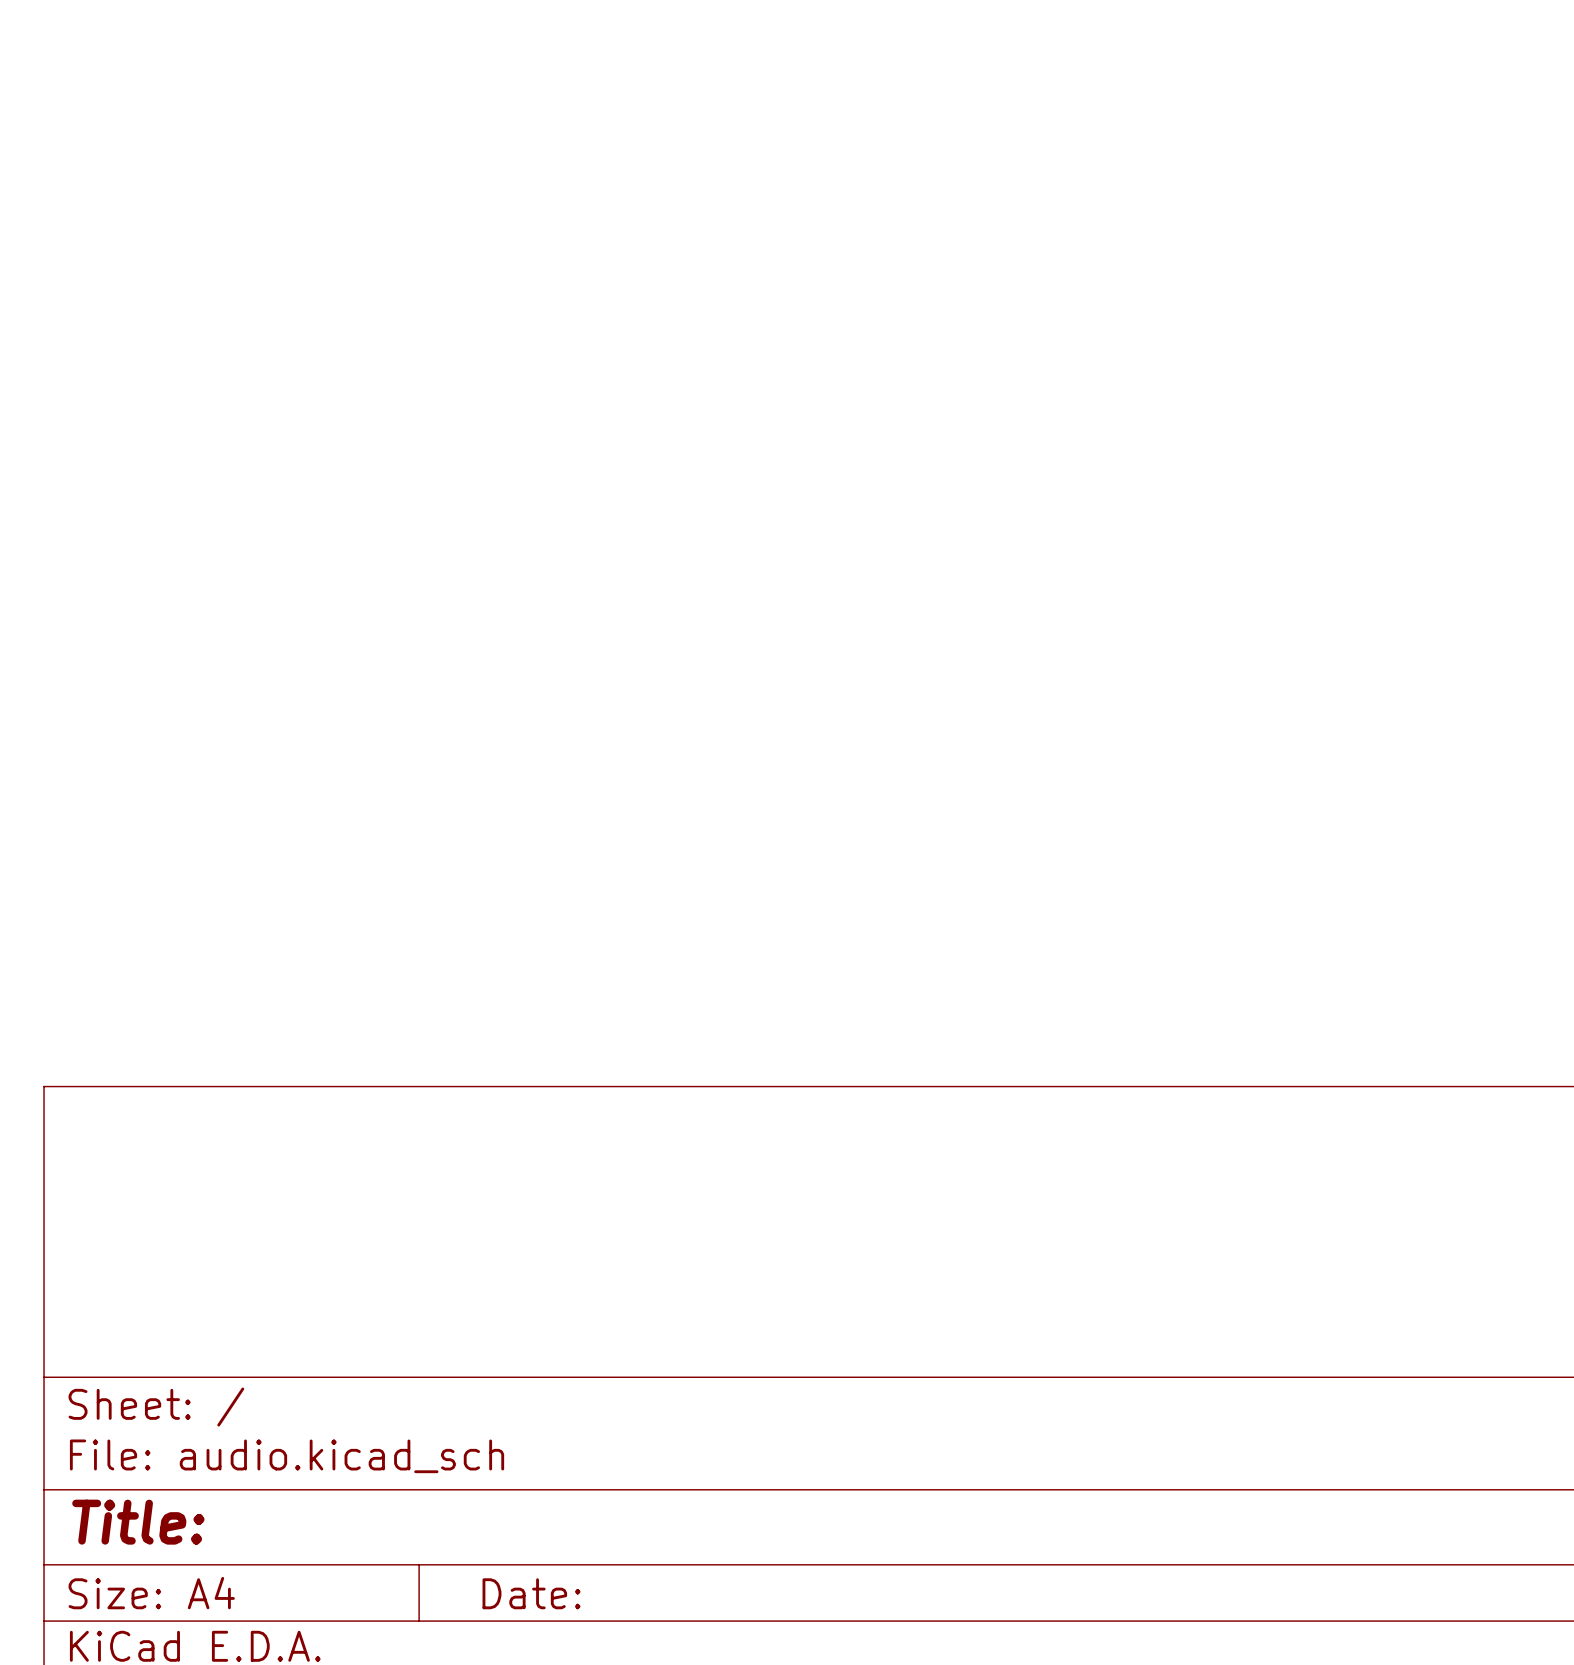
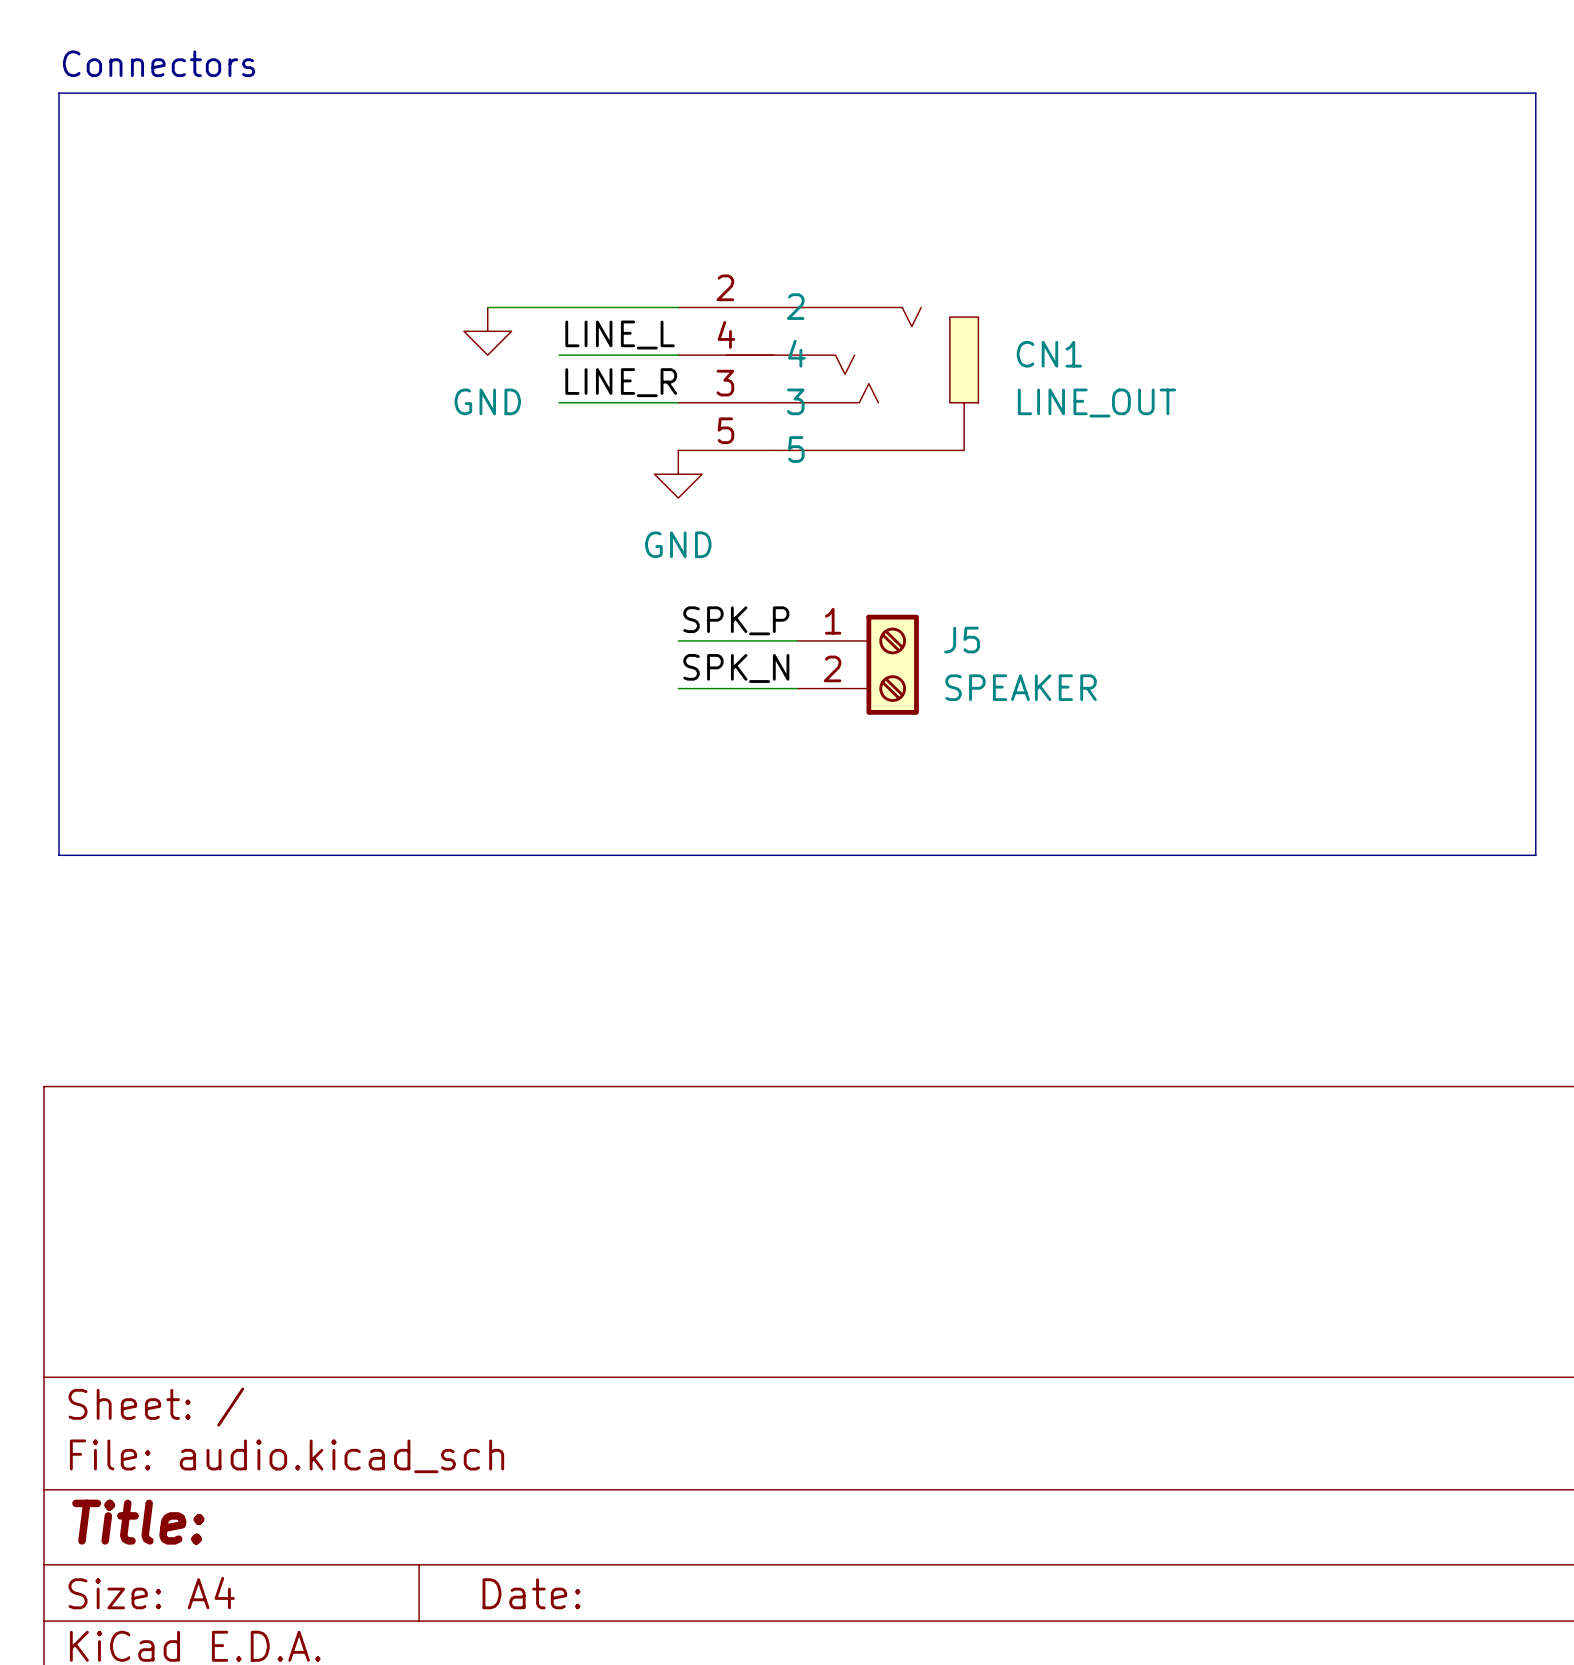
text: none -> Connectors (159, 63)
line: none -> (59, 93) (1535, 93) (1535, 855) (59, 855) (59, 93)
wire: none -> (487, 307) (678, 307)
power symbol: none -> GND (487, 331)
label: none -> LINE_L (620, 335)
wire: none -> (559, 355) (678, 355)
CN1: none -> LINE_OUT (828, 378)
label: none -> LINE_R (621, 382)
wire: none -> (559, 402) (678, 402)
power symbol: none -> GND (678, 474)
label: none -> SPK_P (736, 620)
wire: none -> (678, 640) (797, 640)
J5: none -> SPEAKER (858, 664)
label: none -> SPK_N (736, 668)
wire: none -> (678, 688) (797, 688)

